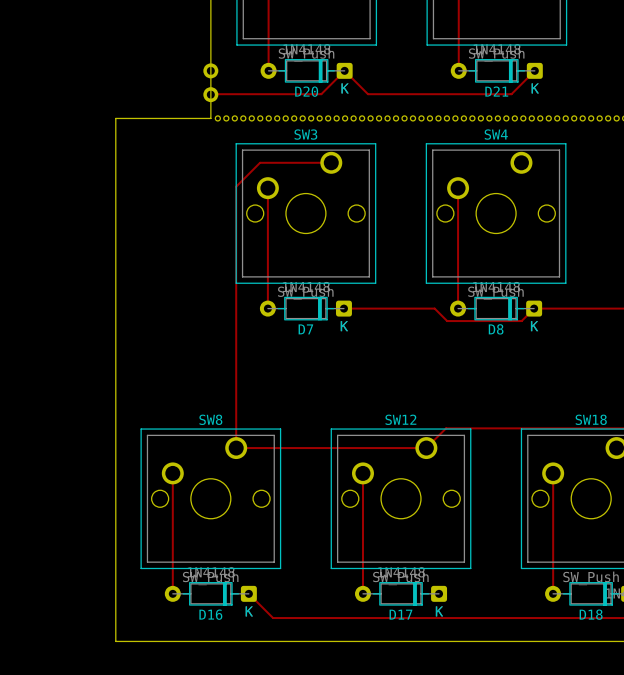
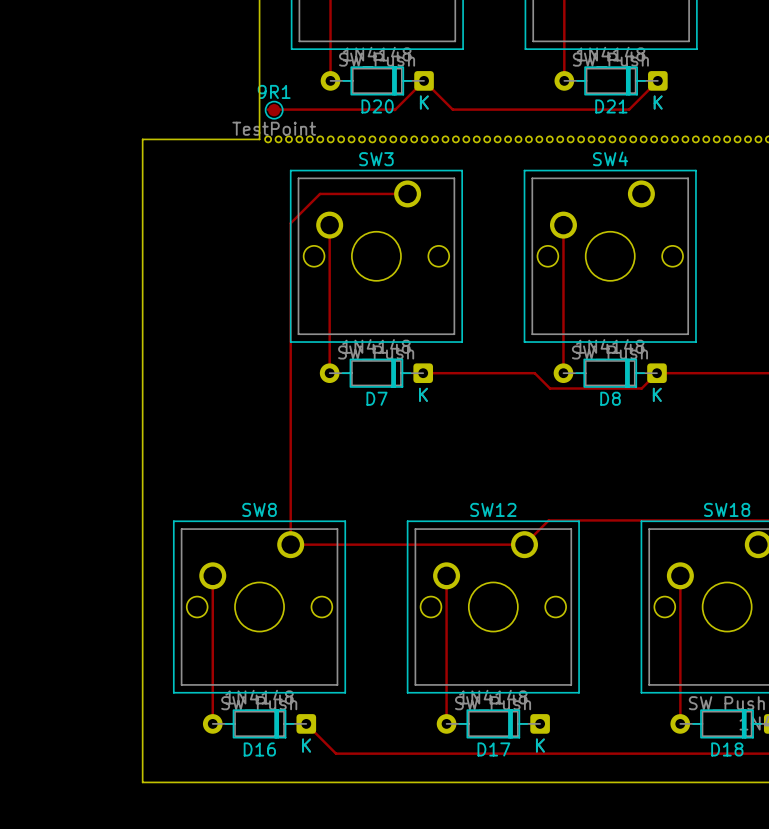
part: (210, 70) -> none
part: (210, 94) -> none
9R1: none -> TestPoint (274, 110)

